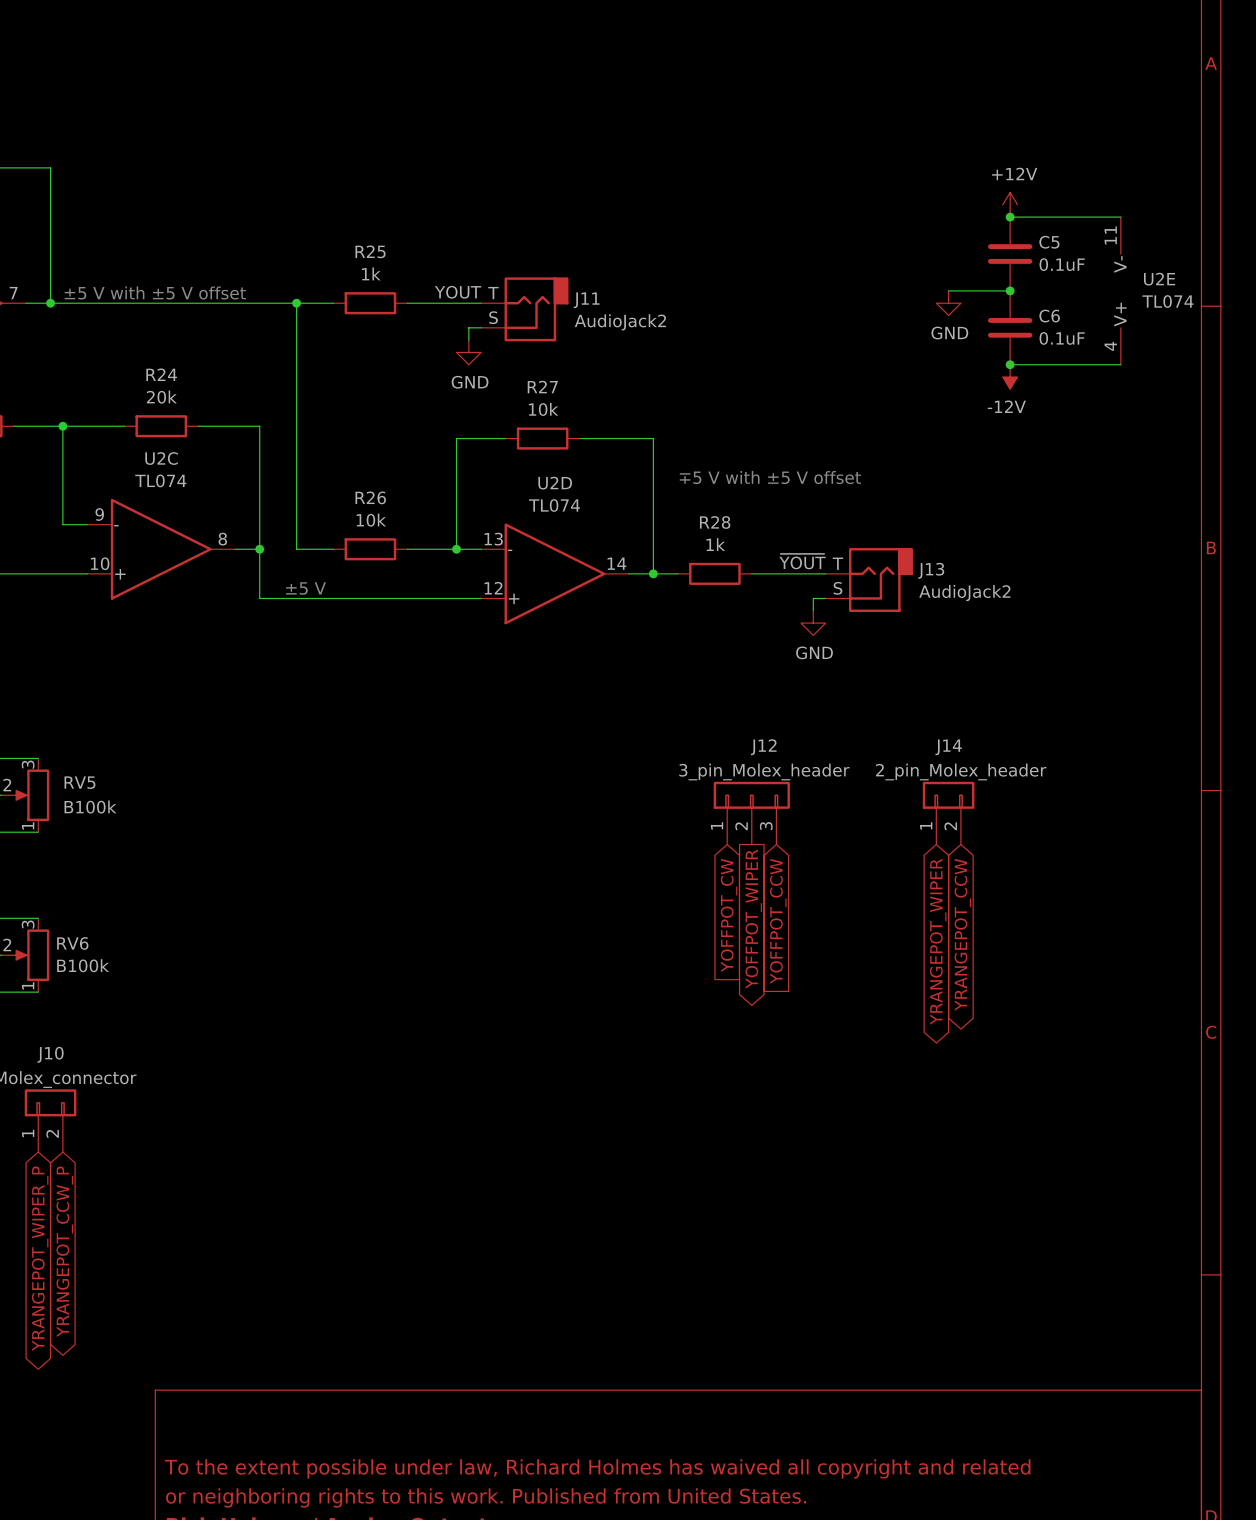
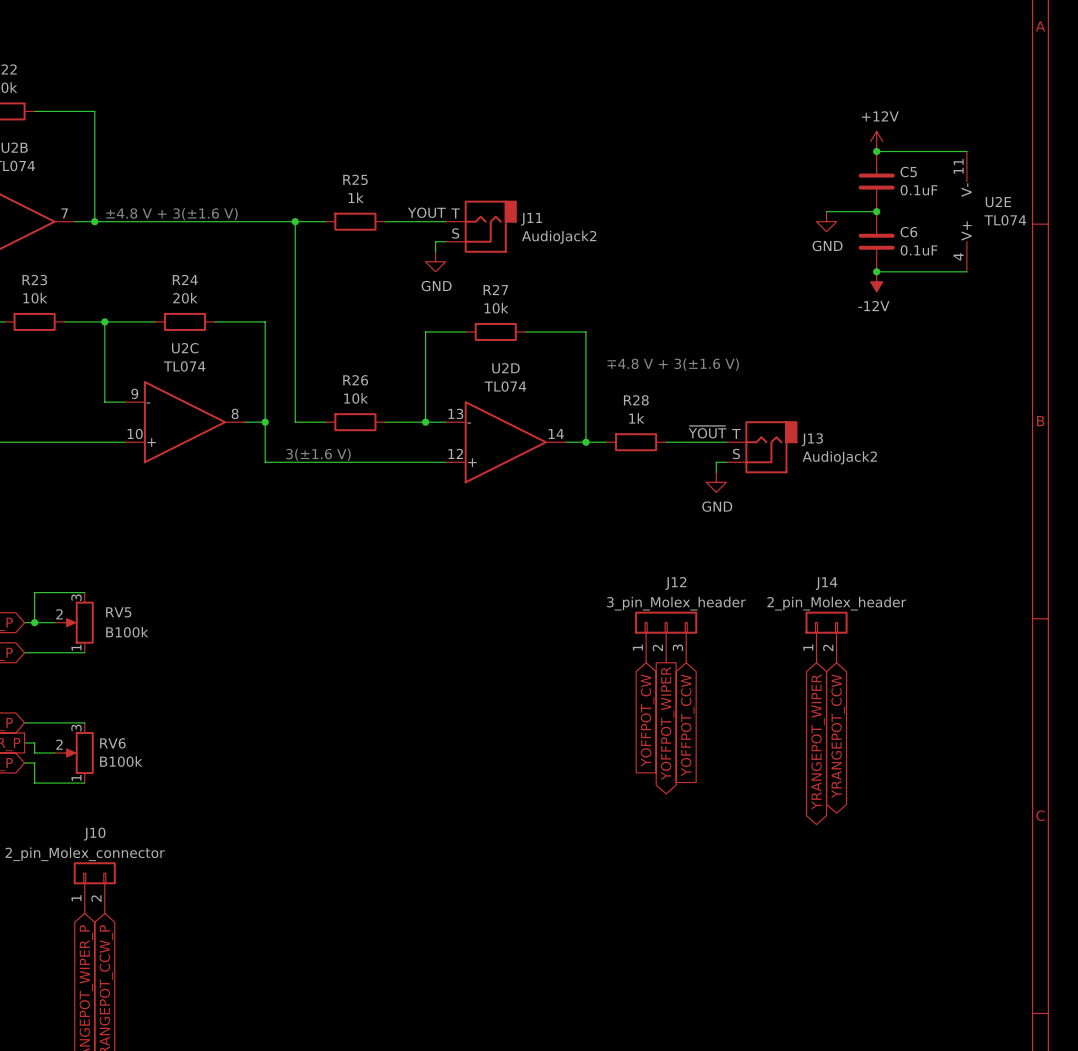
text: ±5 V with ±5 V offset (155, 293) -> ±4.8 V + 3(±1.6 V) (171, 214)
text: ∓5 V with ±5 V offset (770, 477) -> ∓4.8 V + 3(±1.6 V) (673, 364)
text: ±5 V (306, 588) -> 3(±1.6 V) (318, 454)

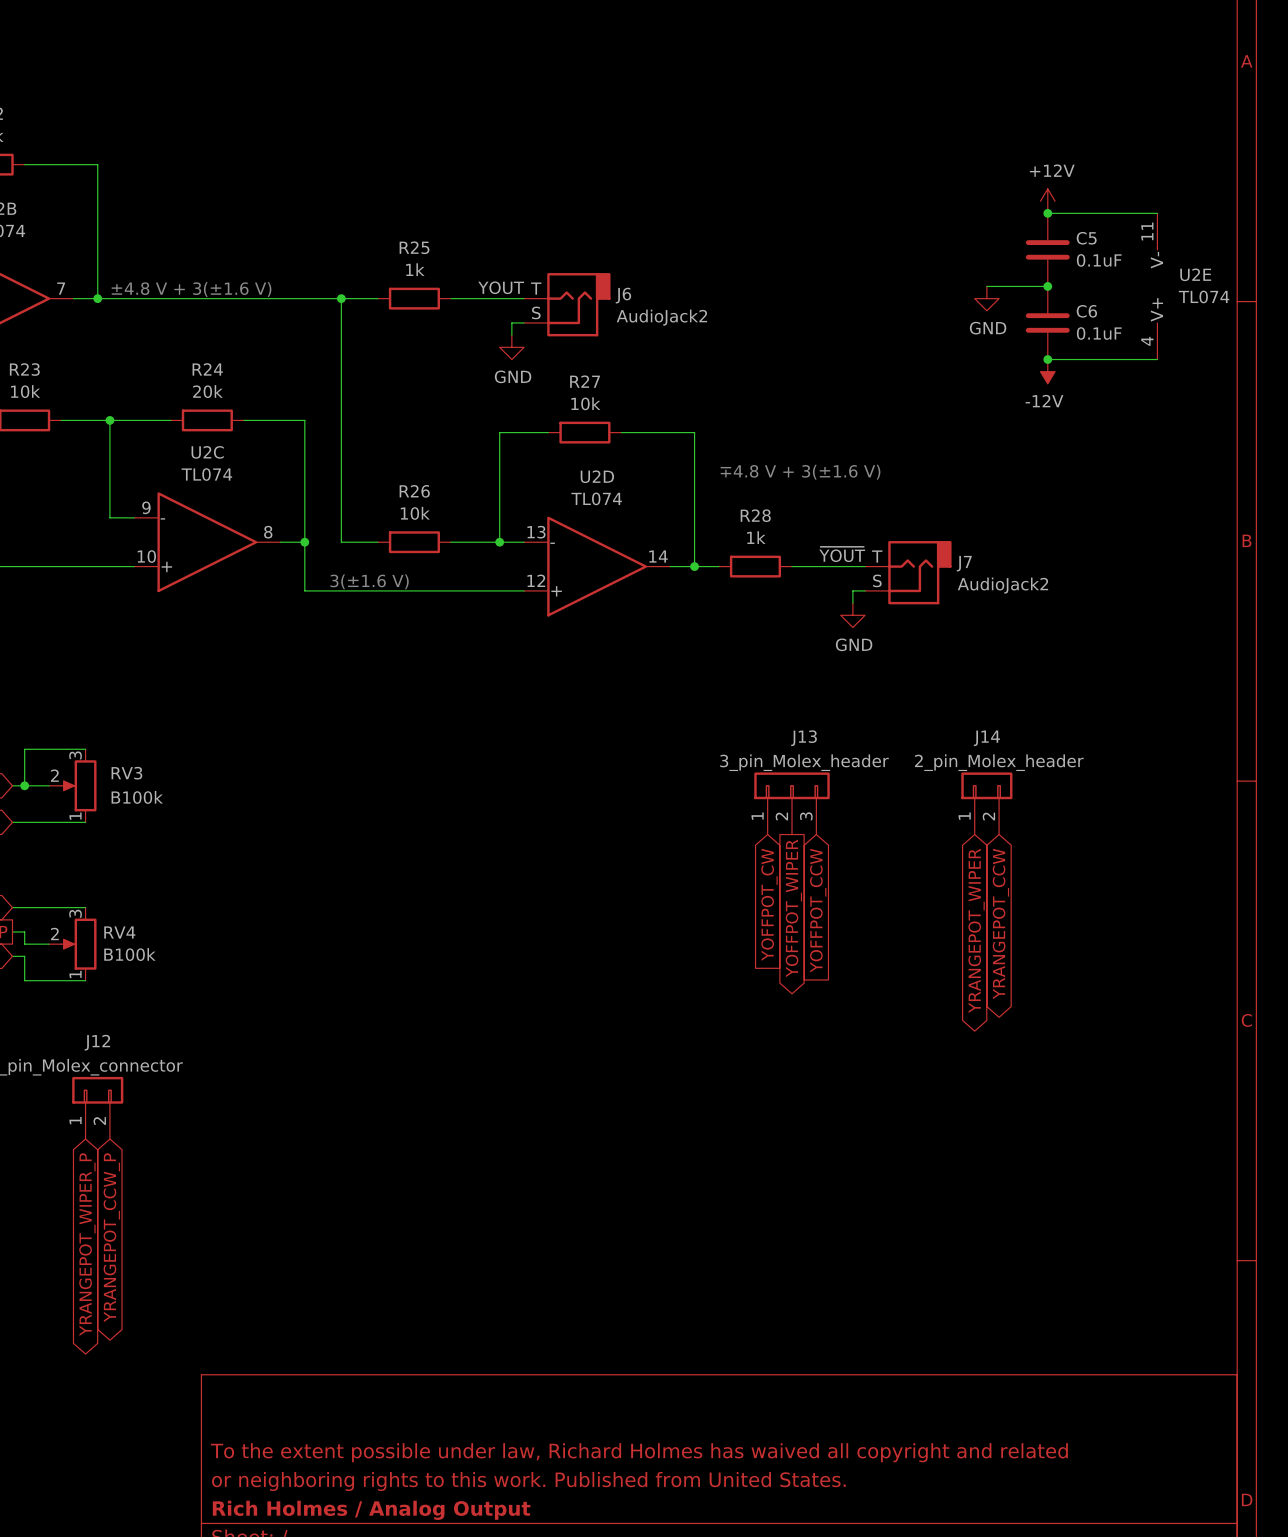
J11 name: J11 (531, 219) -> J6 (623, 295)
J13 name: J13 (812, 439) -> J7 (964, 563)
J12 name: J12 (675, 583) -> J13 (804, 738)
RV5 name: RV5 (118, 612) -> RV3 (126, 773)
RV6 name: RV6 (112, 743) -> RV4 (119, 932)
J10 name: J10 (94, 834) -> J12 (97, 1042)

